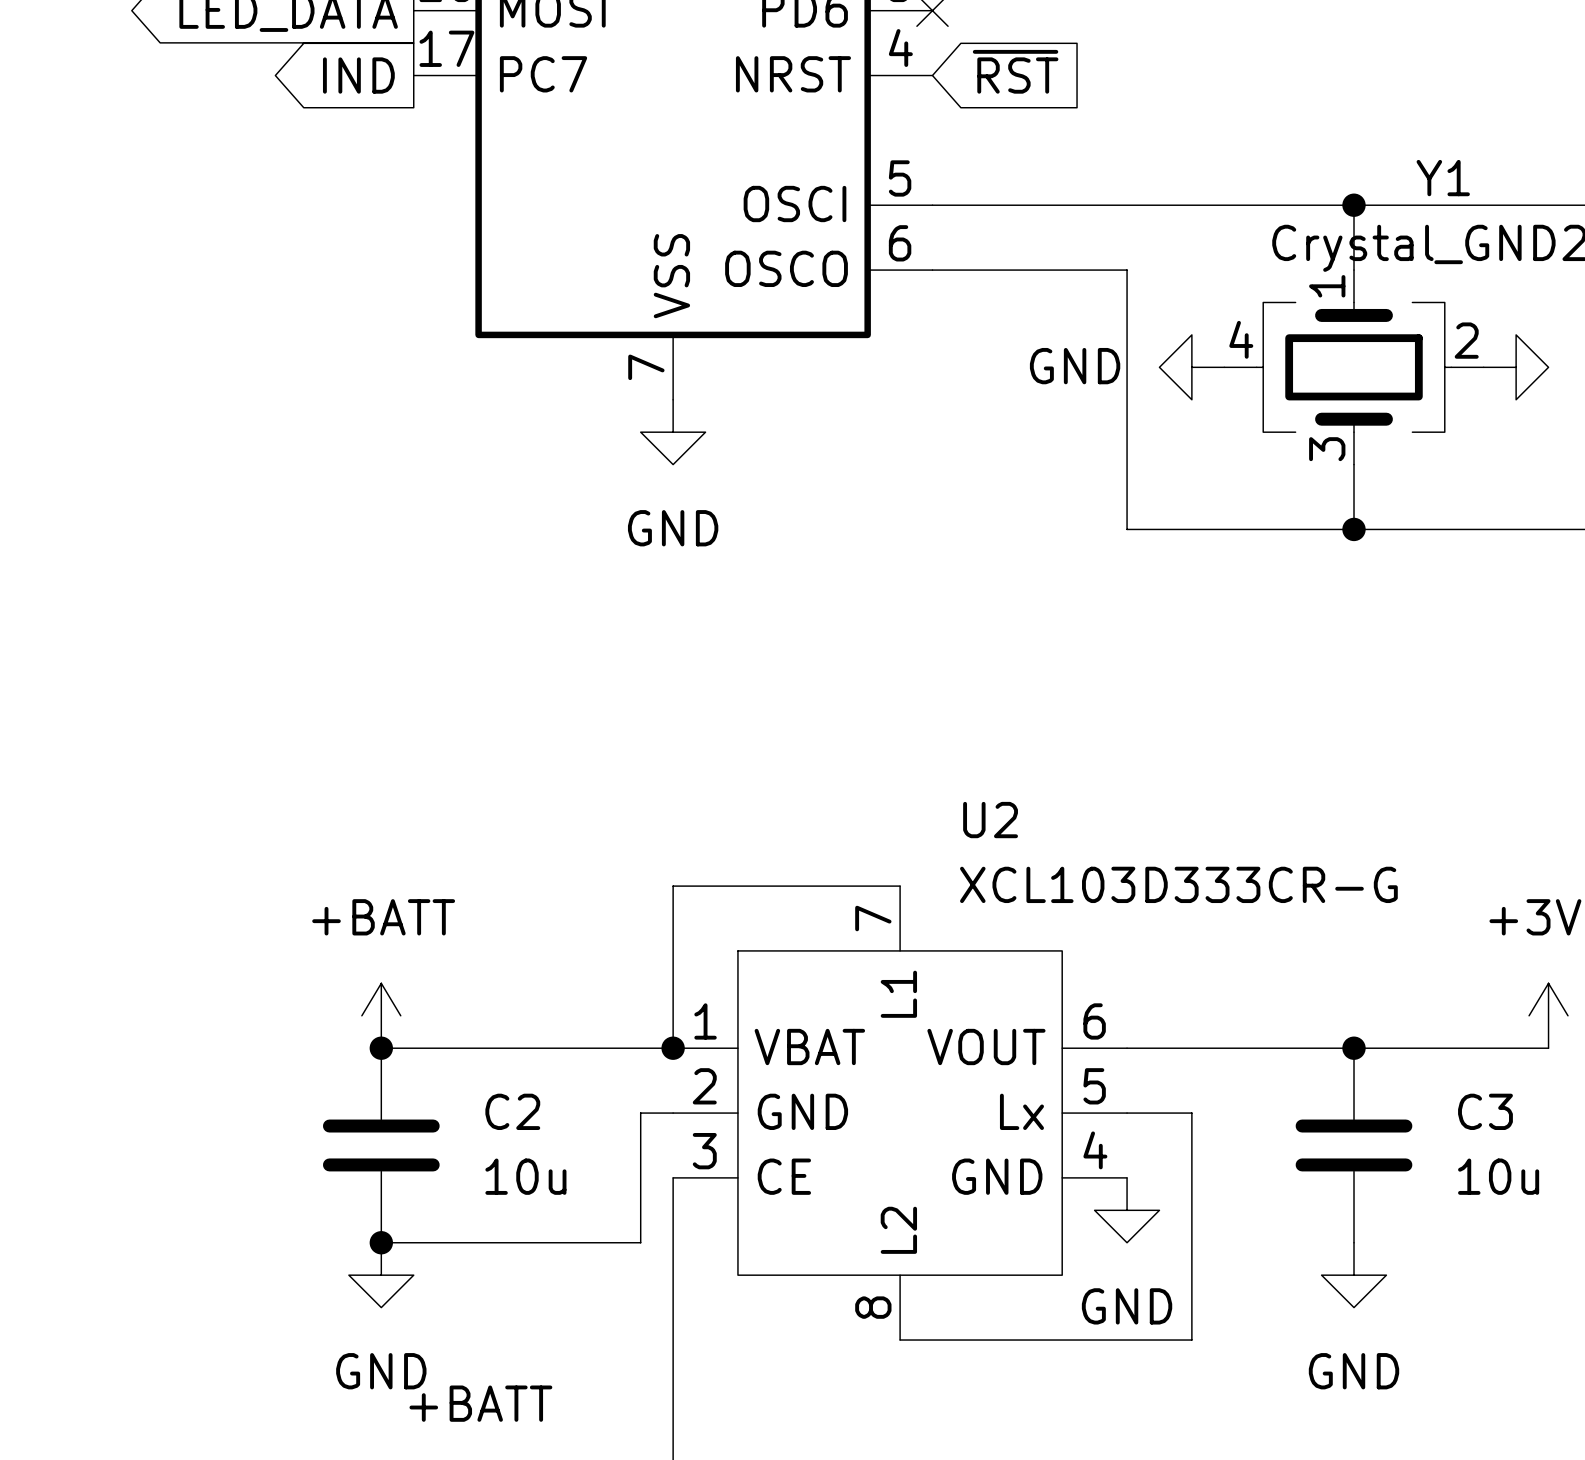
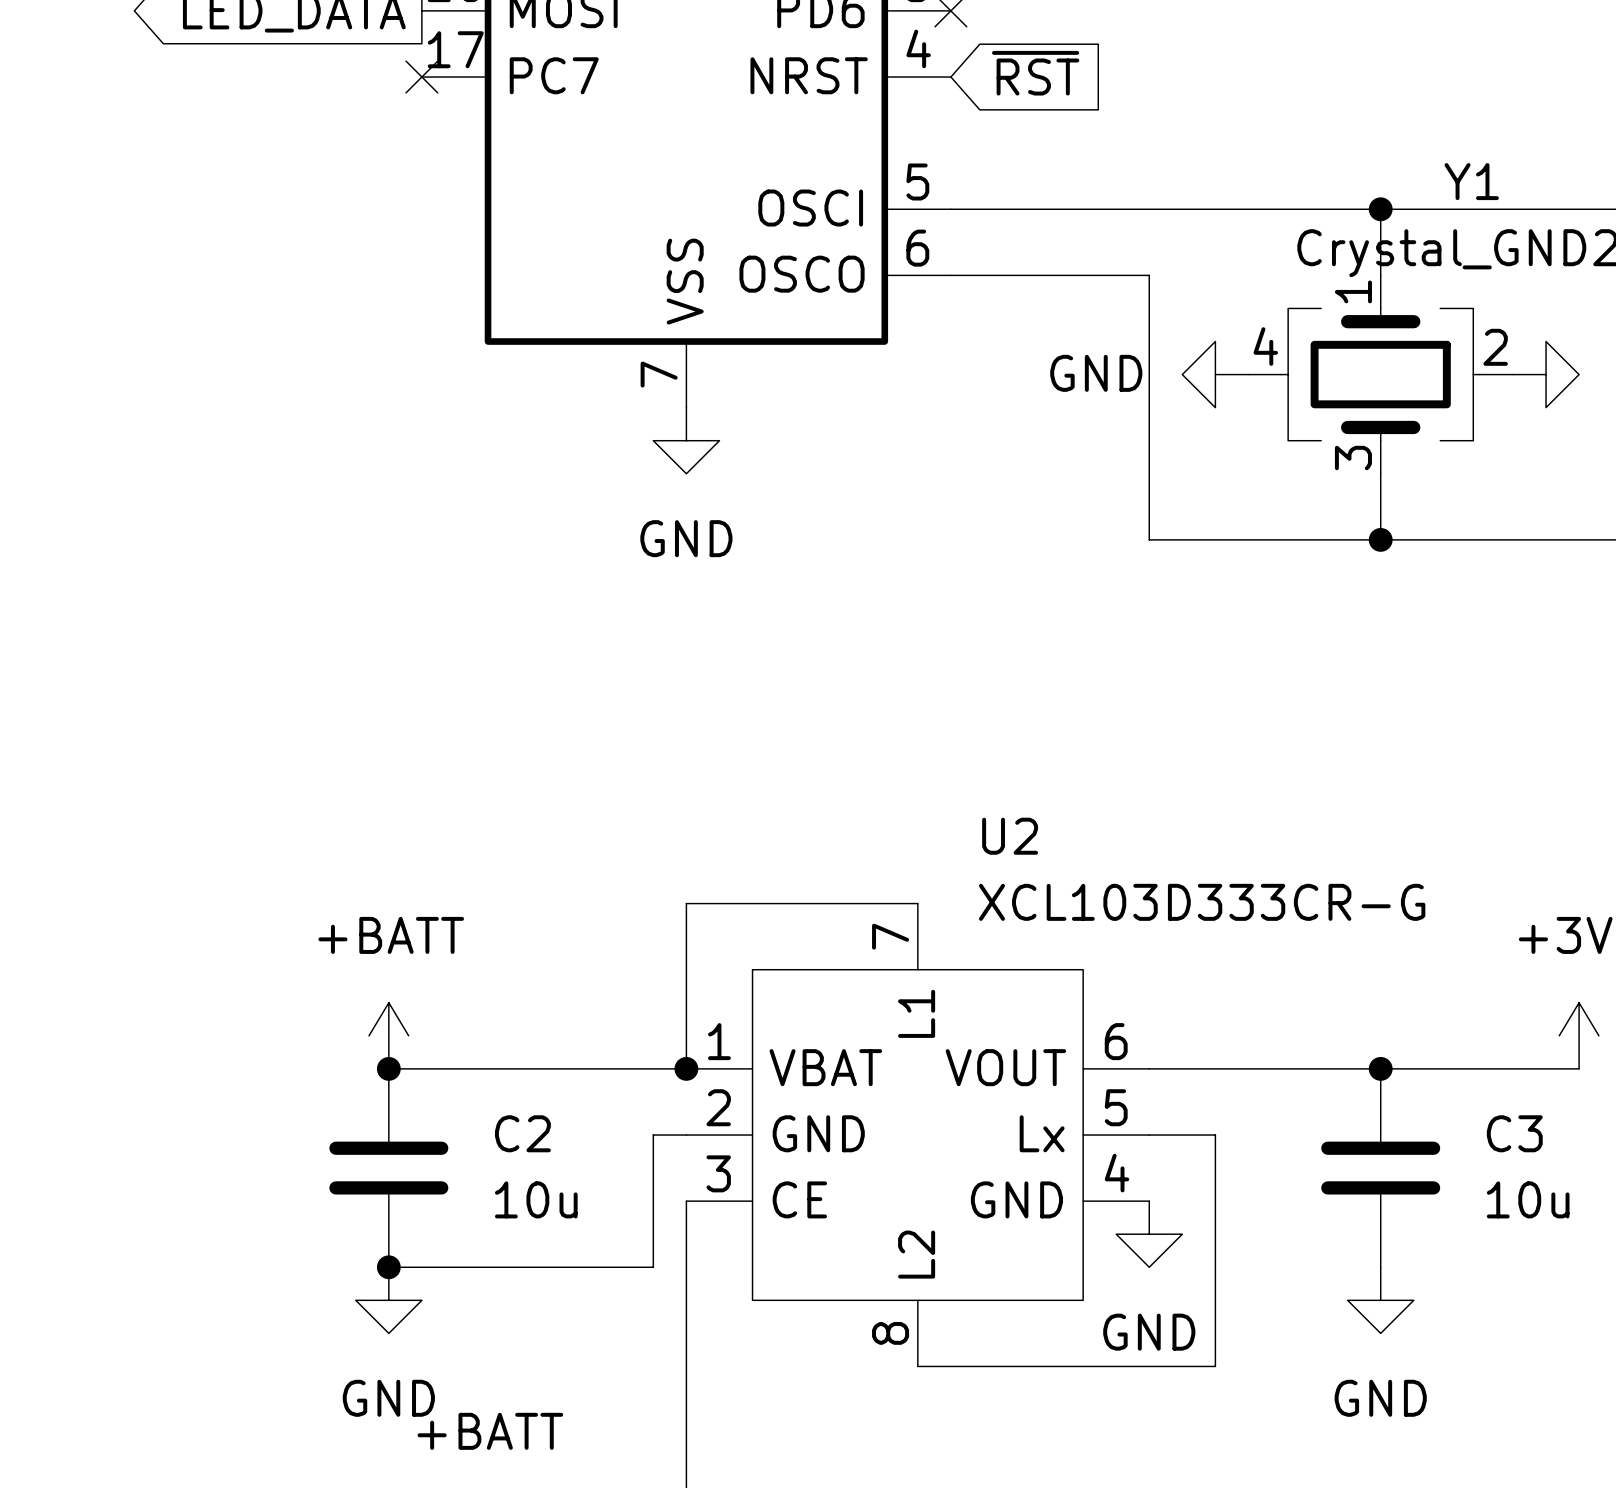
global label: IND (358, 75) -> none
no-connect mark: none -> (421, 77)

